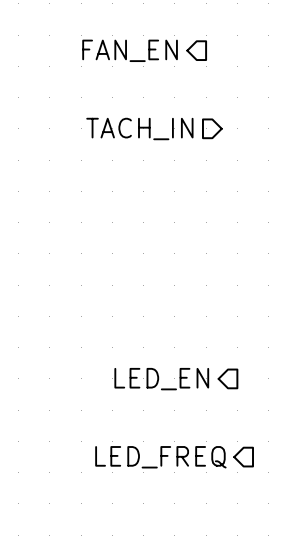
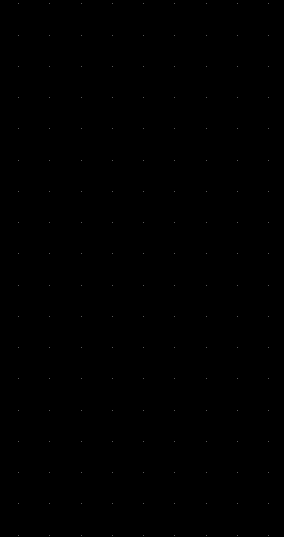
hierarchical label: FAN_EN (130, 50) -> none
hierarchical label: TACH_IN (139, 129) -> none
hierarchical label: LED_EN (161, 379) -> none
hierarchical label: LED_FREQ (160, 457) -> none

